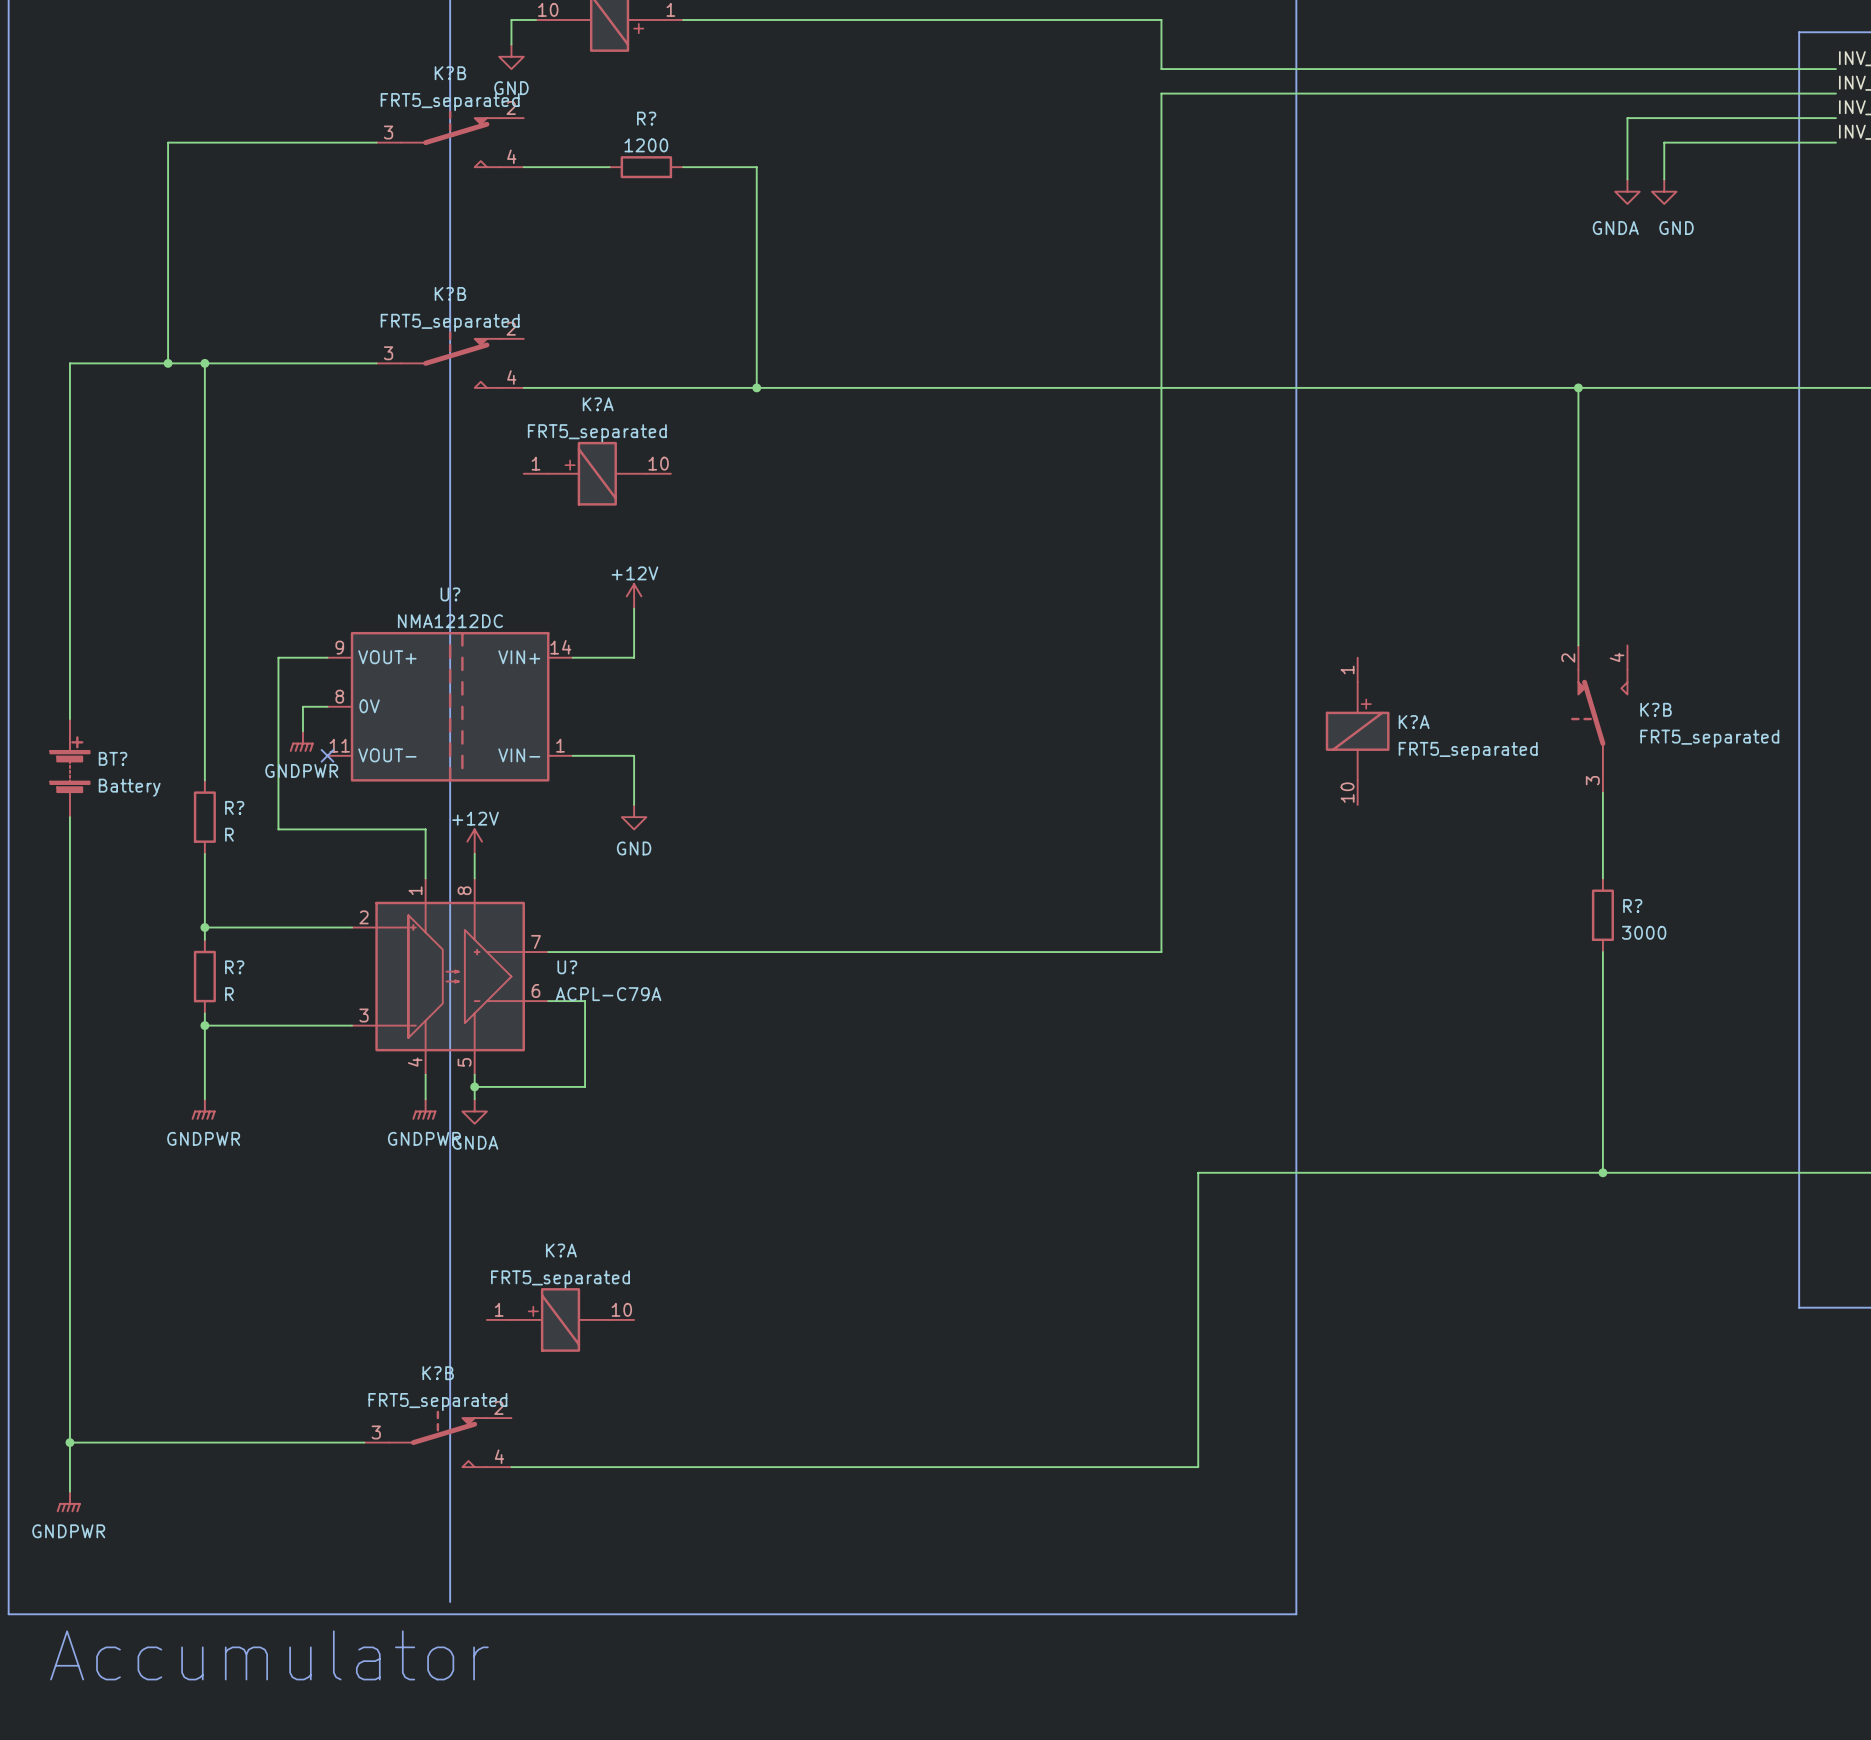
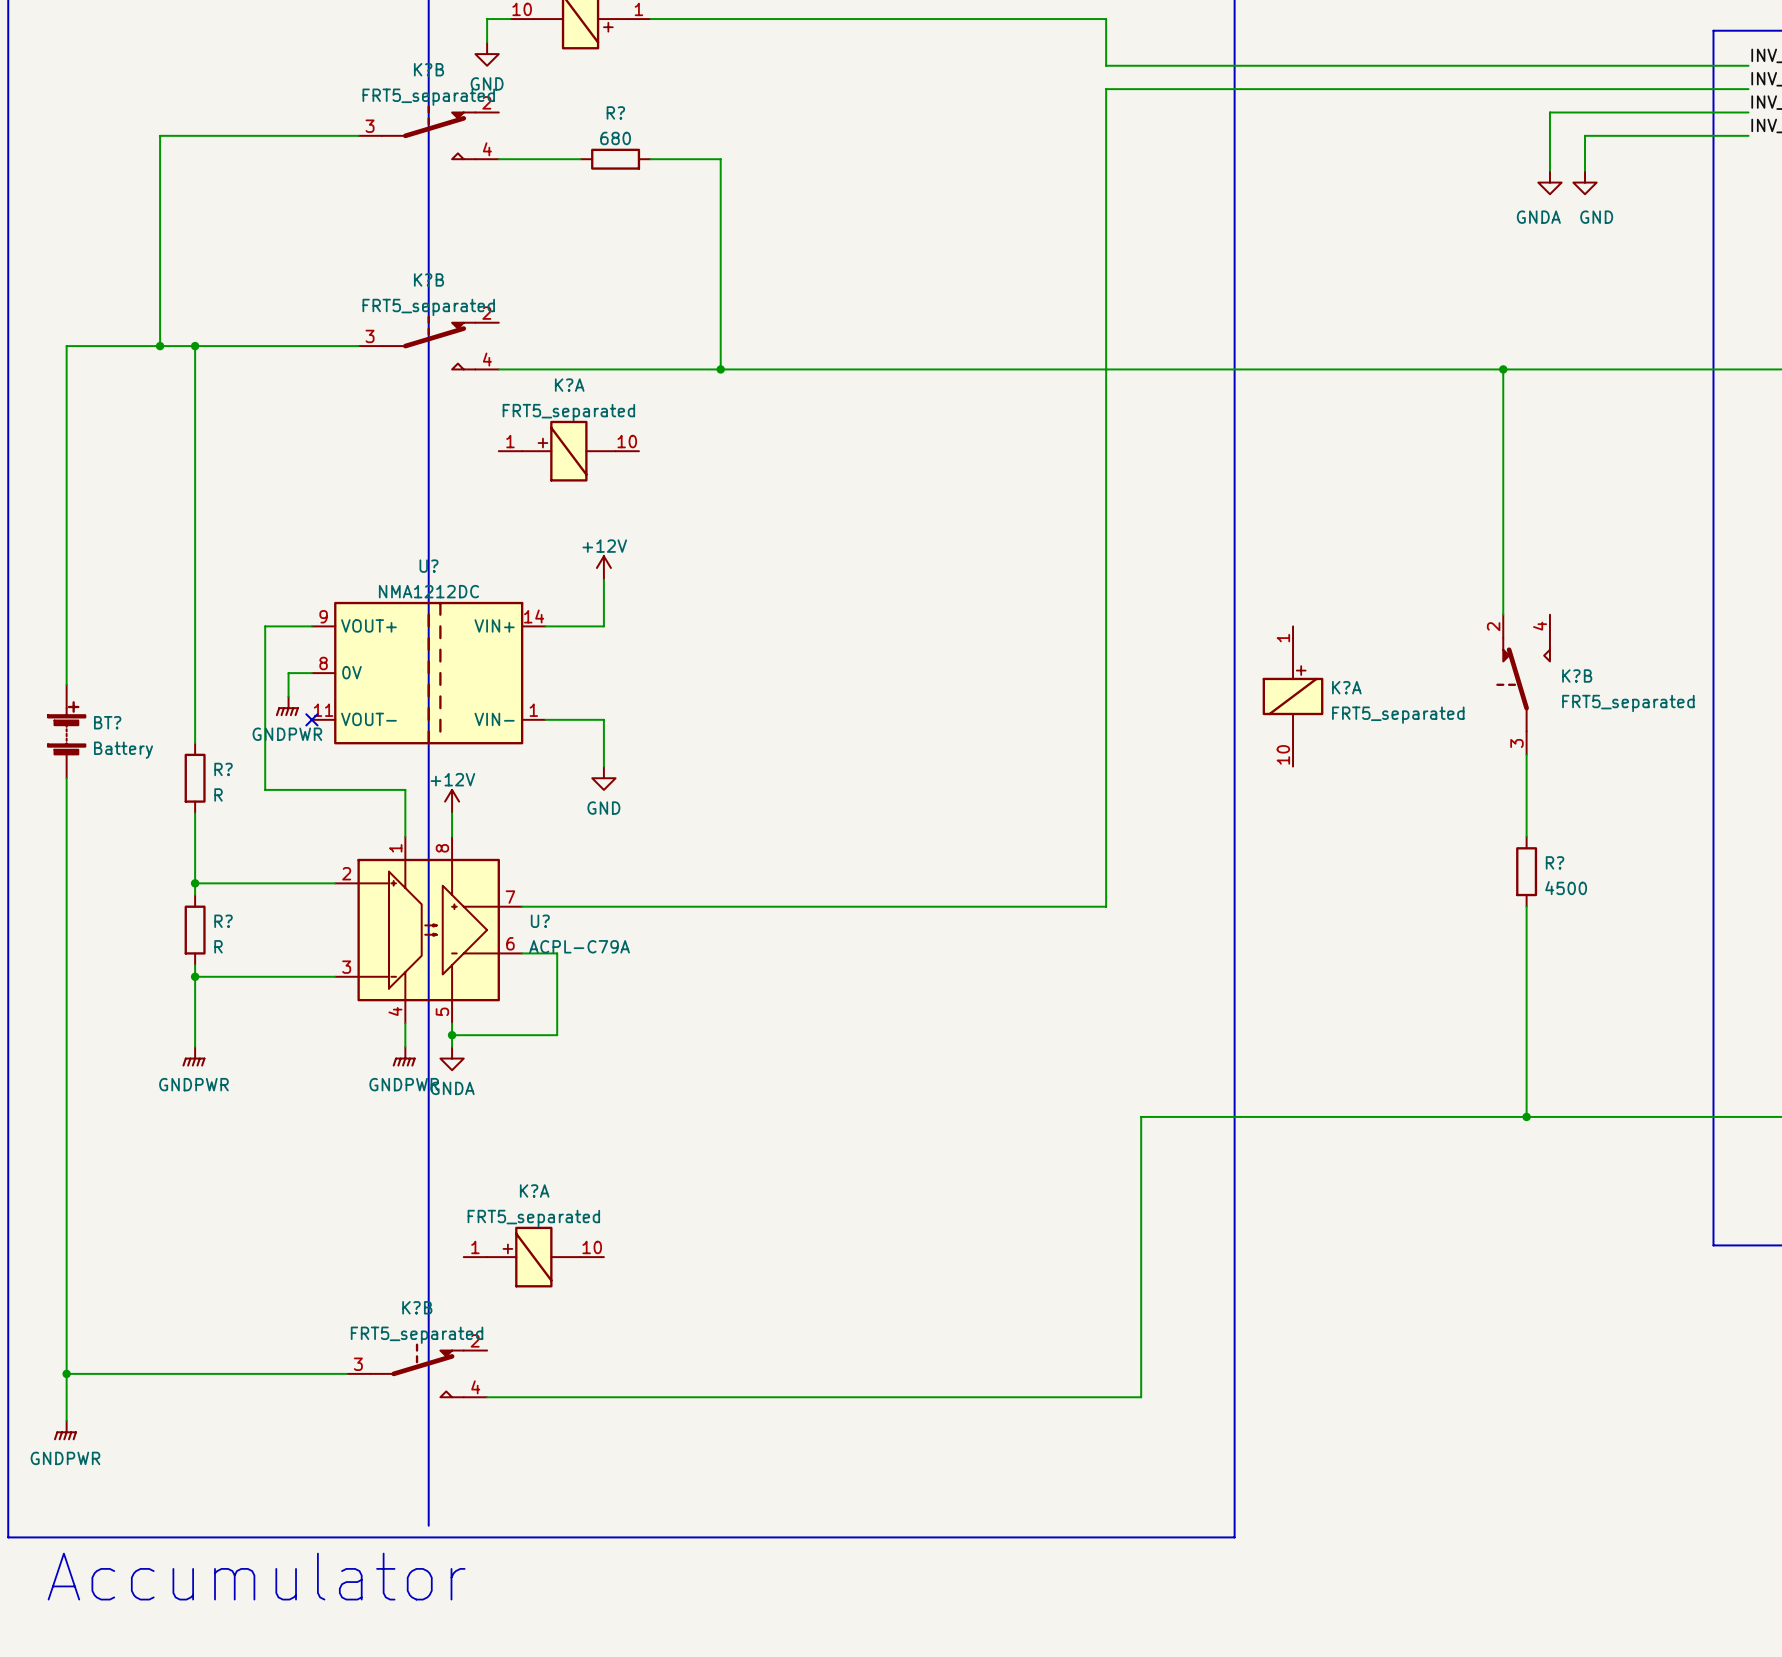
R? value: 1200 (646, 145) -> 680 (615, 138)
R? value: 3000 (1644, 932) -> 4500 (1566, 888)

